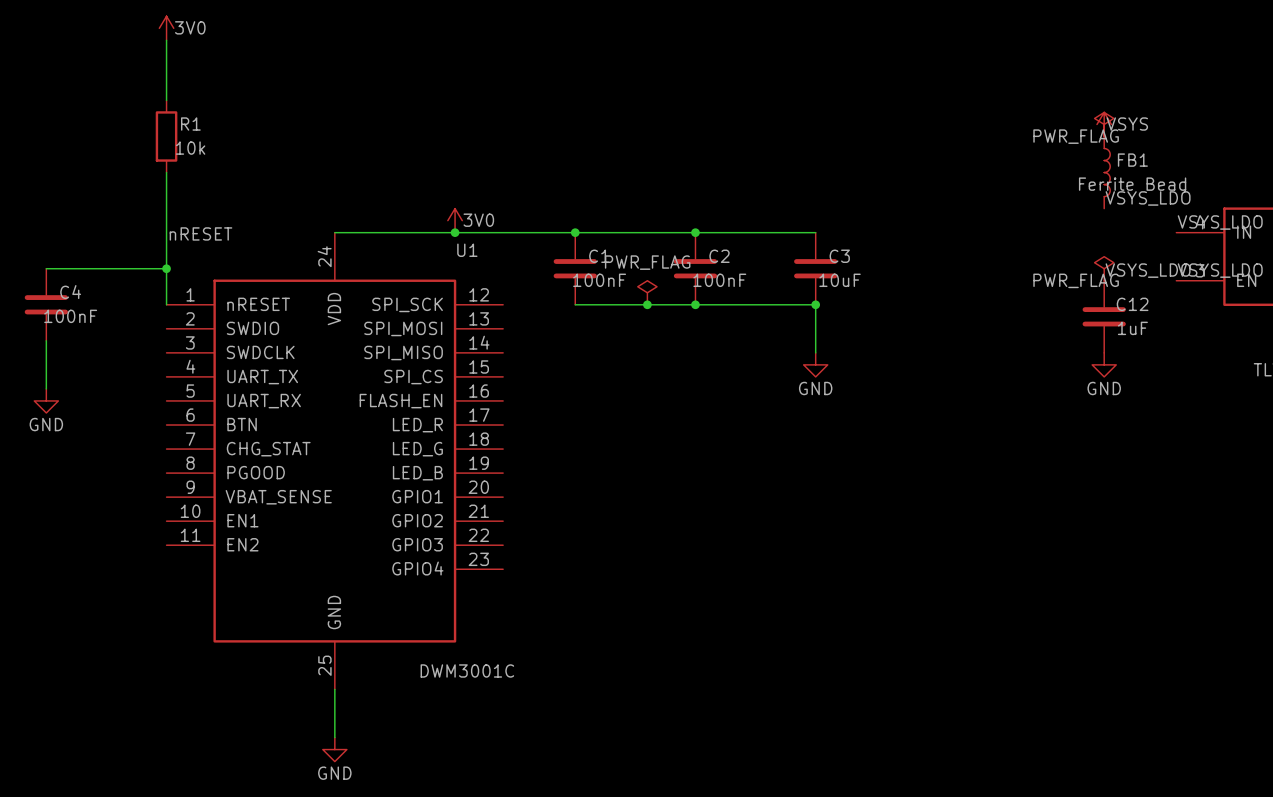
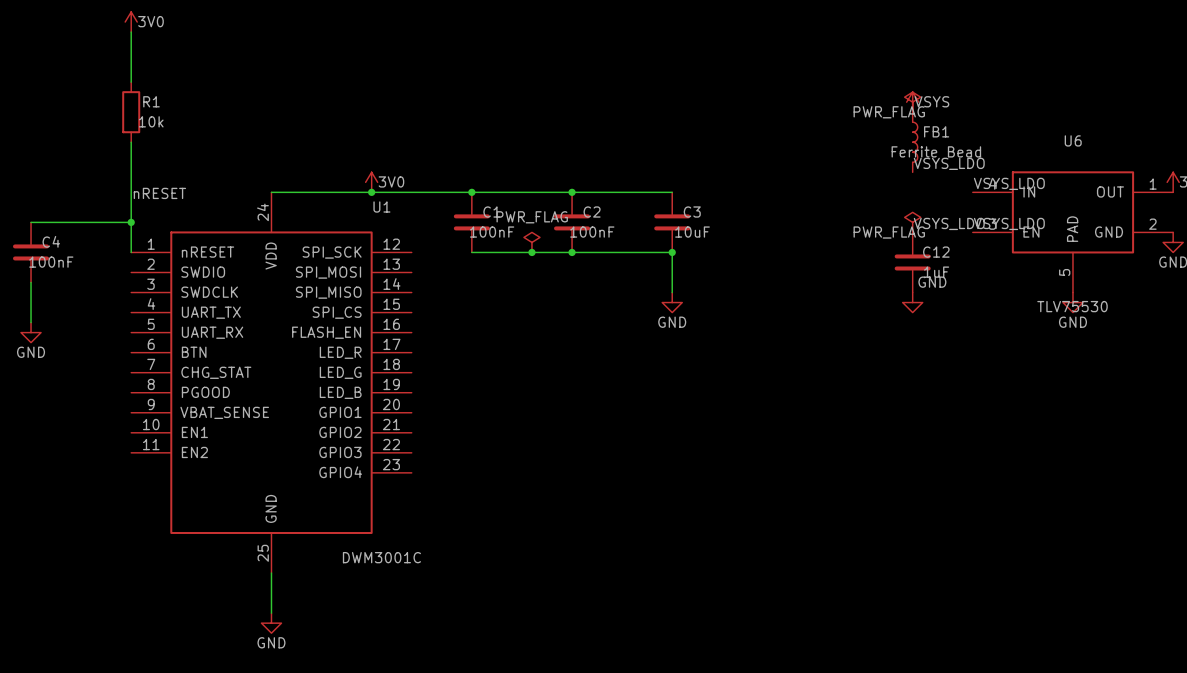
power symbol text position: GND (1104, 388) -> GND (932, 282)

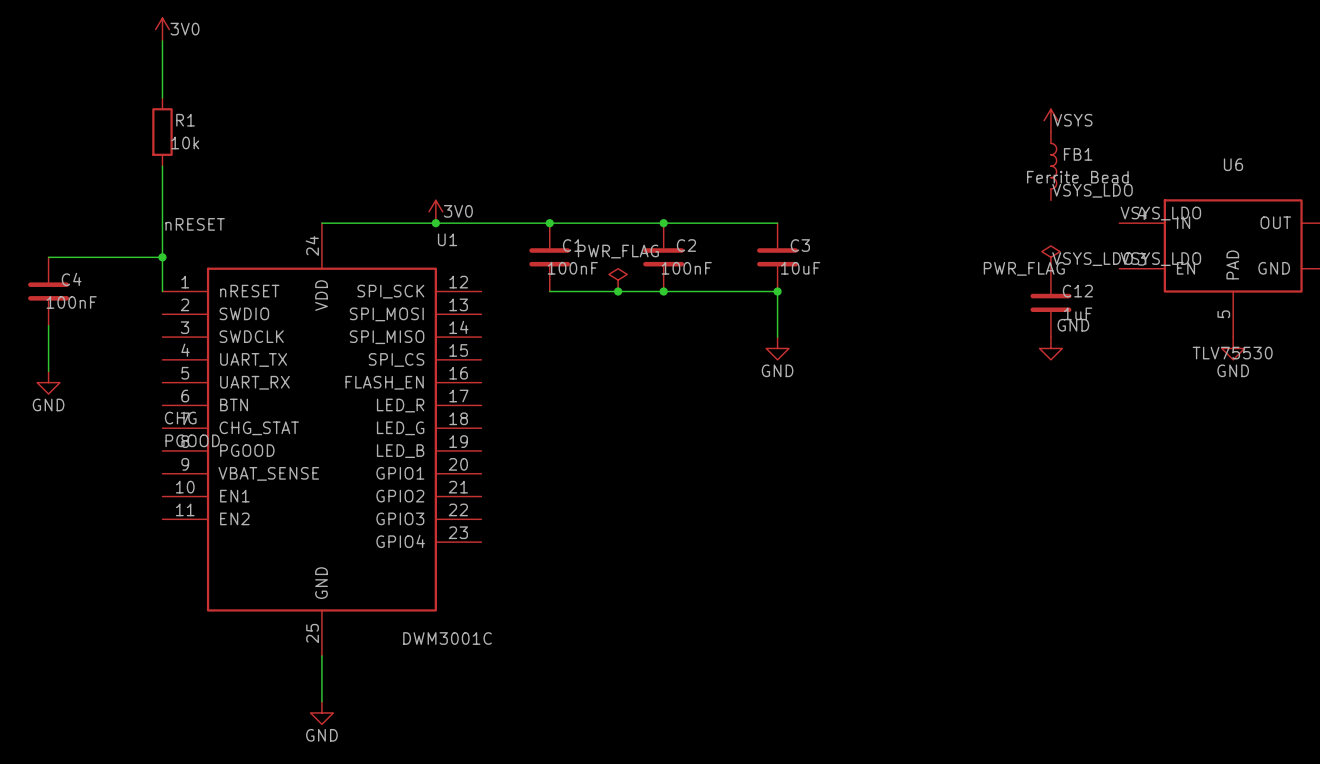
power symbol: PWR_FLAG (912, 102) -> none
label: none -> CHG (180, 418)
label: none -> PGOOD (192, 440)

